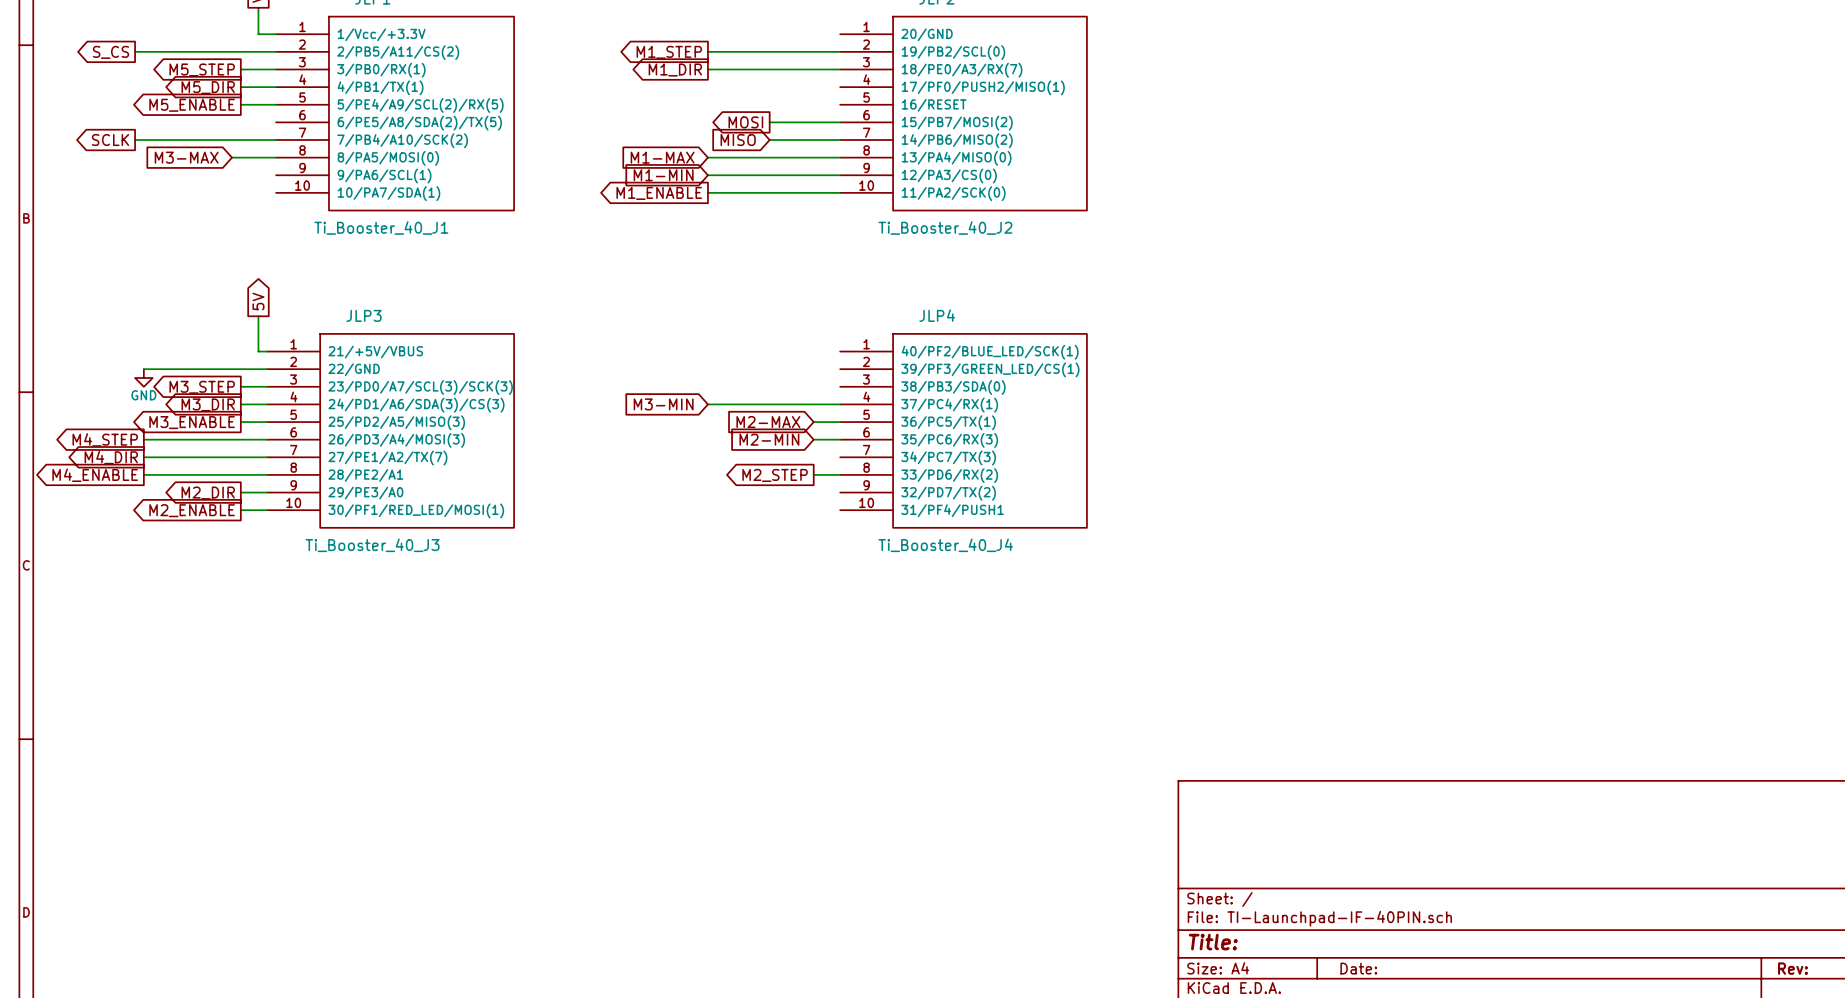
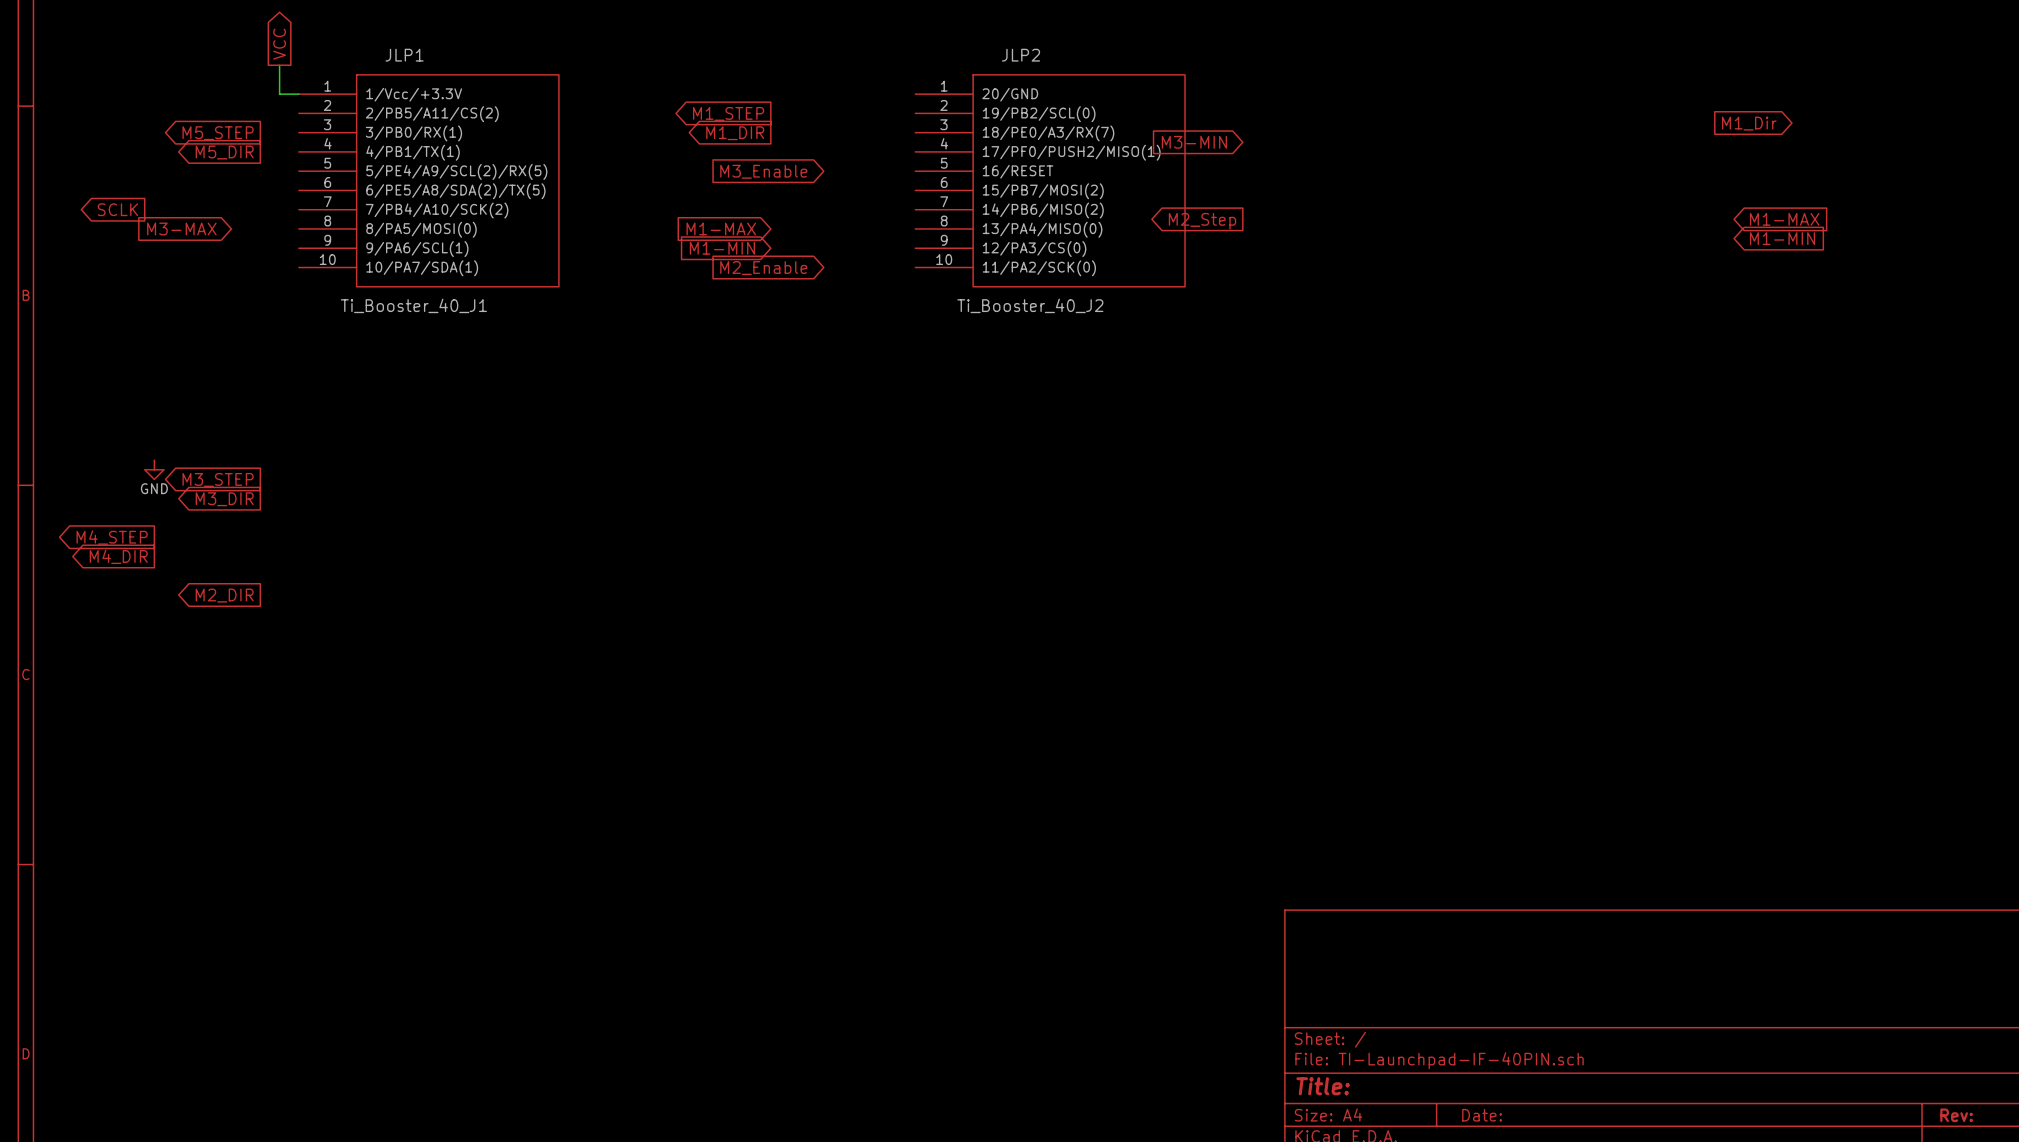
wire: (135, 51) (276, 51) -> none
wire: (707, 51) (840, 51) -> none
global label: S_CS (111, 52) -> none
global label: none -> M1_Dir (1749, 123)
wire: (240, 69) (276, 69) -> none
wire: (707, 69) (840, 69) -> none
global label: none -> M3-MIN (1194, 142)
wire: (240, 87) (276, 87) -> none
wire: (240, 104) (276, 104) -> none
global label: M5_ENABLE (192, 105) -> none
global label: none -> M3_Enable (763, 171)
global label: MOSI (745, 122) -> none
wire: (769, 122) (840, 122) -> none
wire: (135, 140) (276, 140) -> none
global label: MISO (738, 140) -> none
wire: (769, 140) (840, 140) -> none
global label: none -> M1-MAX (1784, 219)
global label: none -> M2_Step (1202, 221)
global label position: M3-MAX (186, 157) -> M3-MAX (181, 228)
wire: (232, 157) (276, 157) -> none
wire: (707, 157) (840, 157) -> none
global label: none -> M1-MIN (1782, 238)
wire: (707, 175) (840, 175) -> none
wire: (707, 192) (840, 192) -> none
global label: M1_ENABLE (659, 193) -> none
global label: none -> M2_Enable (763, 268)
global label: 5V (258, 301) -> none
wire: (258, 316) (258, 351) (267, 351) -> none
wire: (143, 369) (267, 369) -> none
wire: (240, 386) (267, 386) -> none
wire: (240, 404) (267, 404) -> none
global label: M3-MIN (663, 404) -> none
wire: (707, 404) (840, 404) -> none
global label: M3_ENABLE (192, 422) -> none
wire: (240, 422) (267, 422) -> none
global label: M2-MAX (768, 422) -> none
wire: (813, 422) (840, 422) -> none
JLP3: Ti_Booster_40_J3 (390, 430) -> none
JLP4: Ti_Booster_40_J4 (963, 430) -> none
wire: (143, 439) (267, 439) -> none
global label: M2-MIN (769, 439) -> none
wire: (813, 439) (840, 439) -> none
wire: (143, 457) (267, 457) -> none
wire: (143, 474) (267, 474) -> none
wire: (813, 474) (840, 474) -> none
global label: M4_ENABLE (95, 475) -> none
global label: M2_STEP (775, 475) -> none
wire: (240, 492) (267, 492) -> none
global label: M2_ENABLE (192, 510) -> none
wire: (240, 510) (267, 510) -> none

